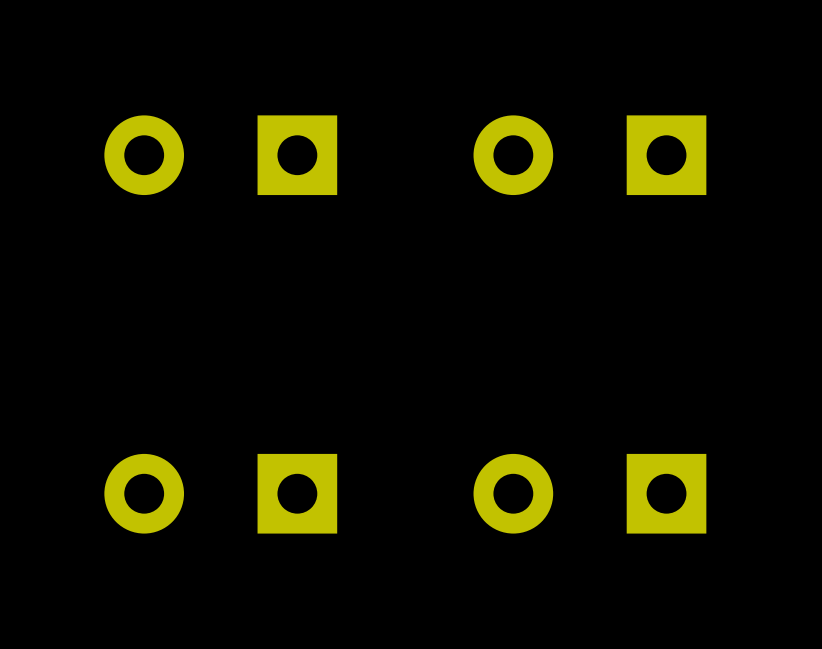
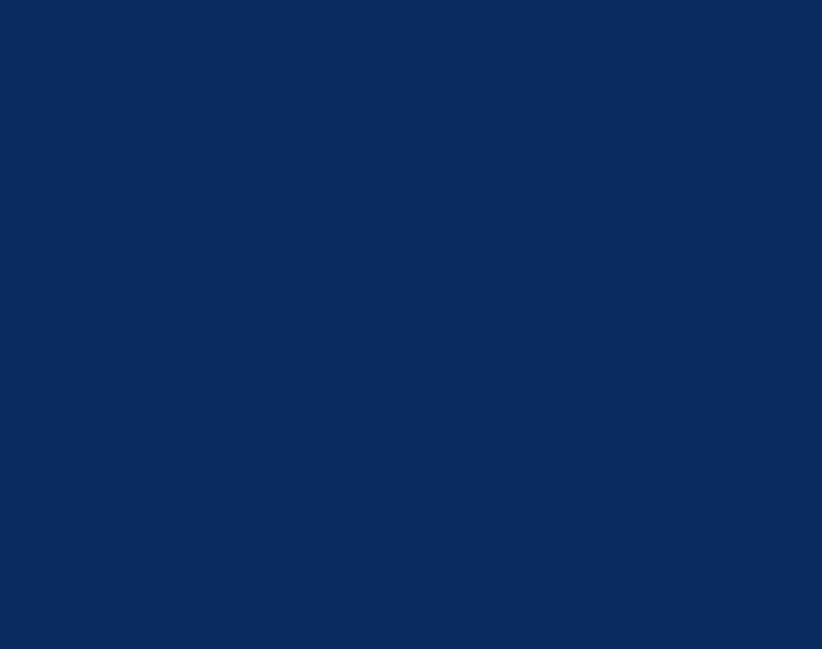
part: (220, 155) -> none
part: (589, 155) -> none
part: (220, 493) -> none
part: (589, 493) -> none

